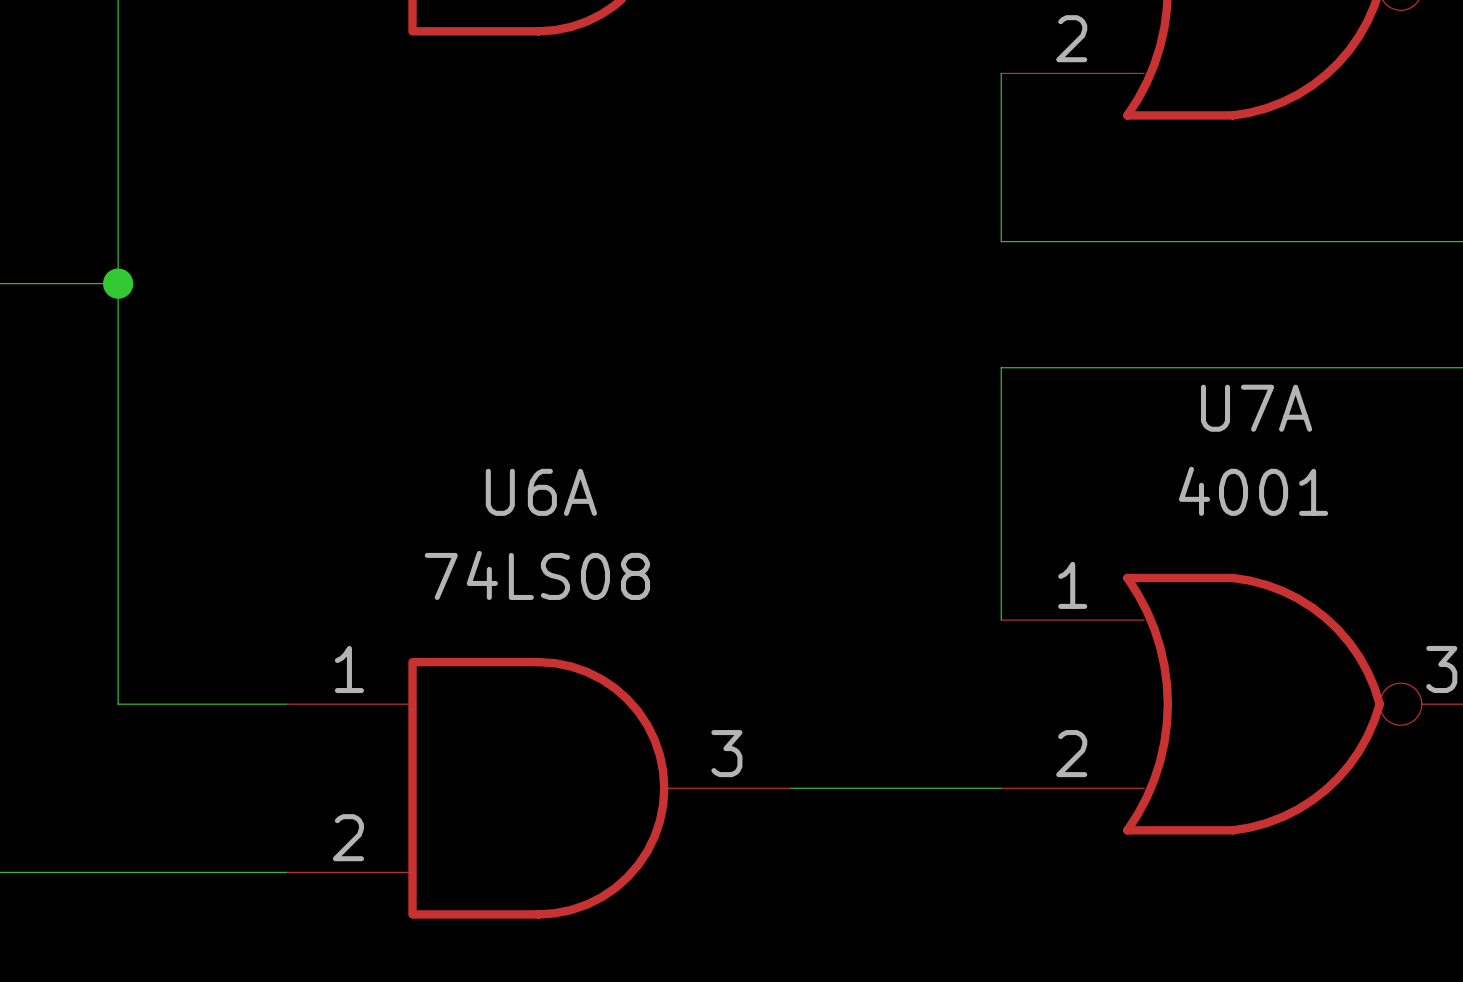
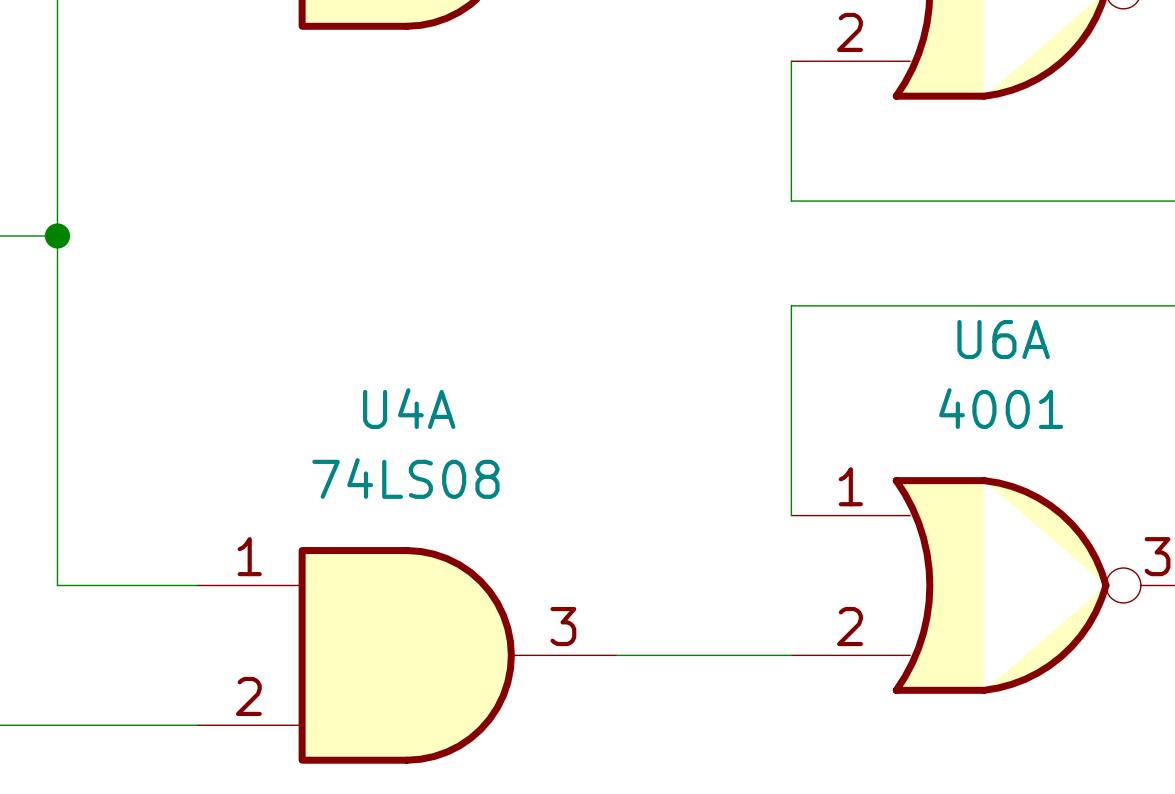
U7A name: U7A (1256, 408) -> U6A (1003, 339)
U6A name: U6A (541, 492) -> U4A (409, 408)

